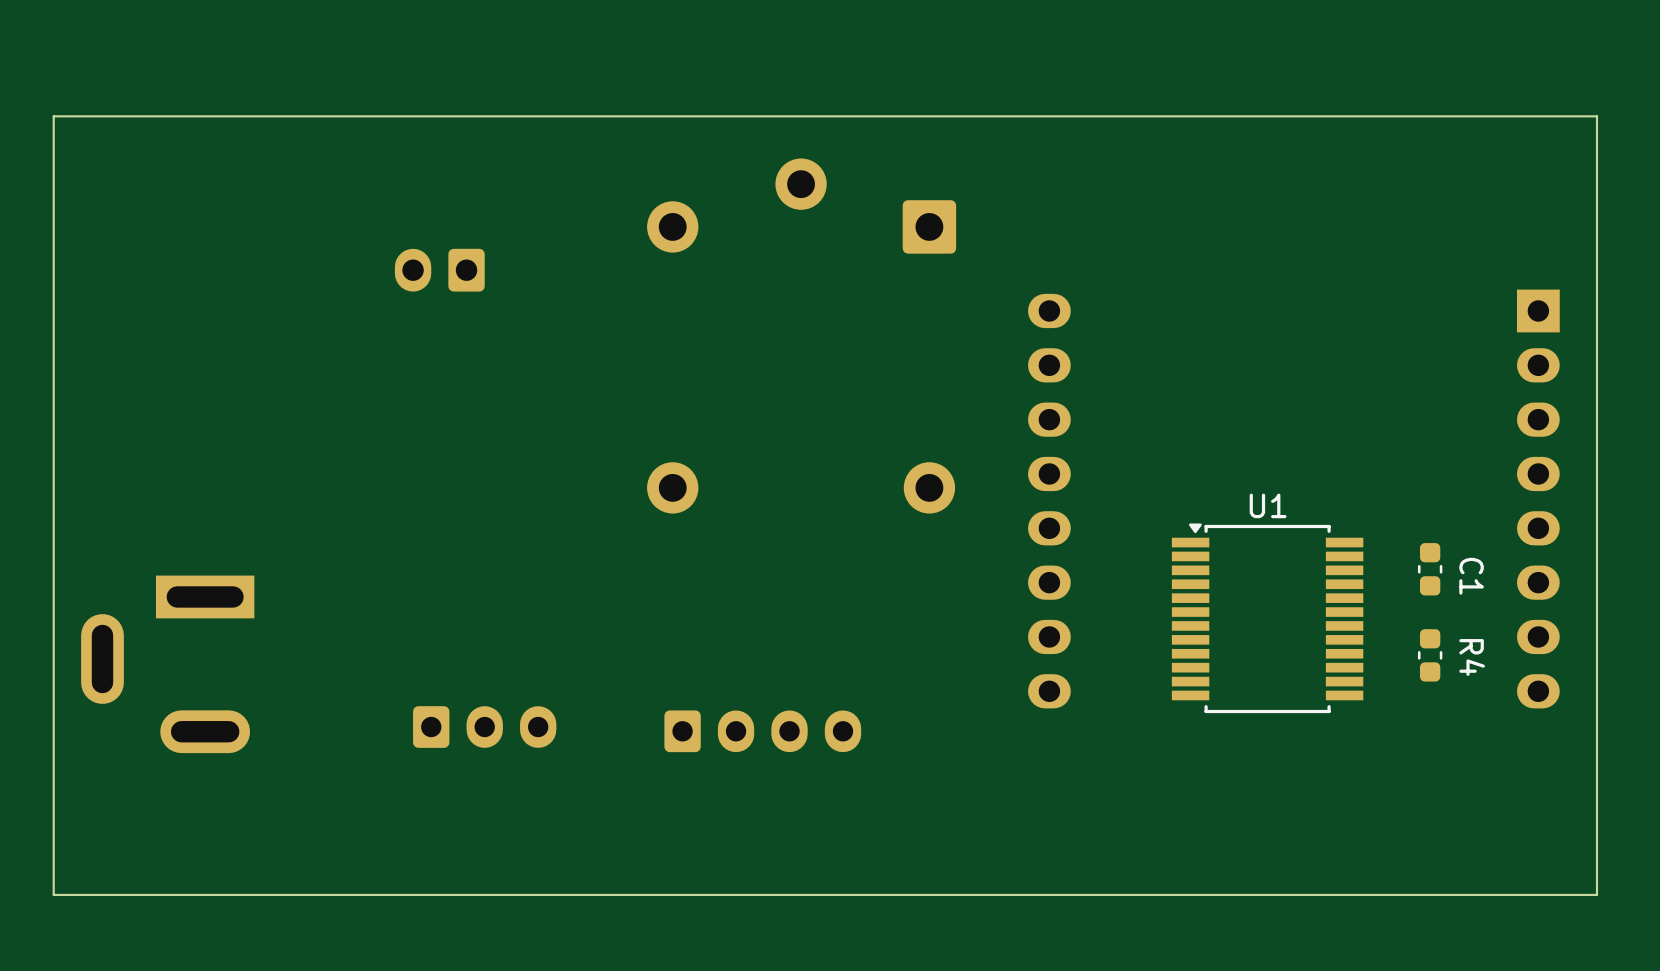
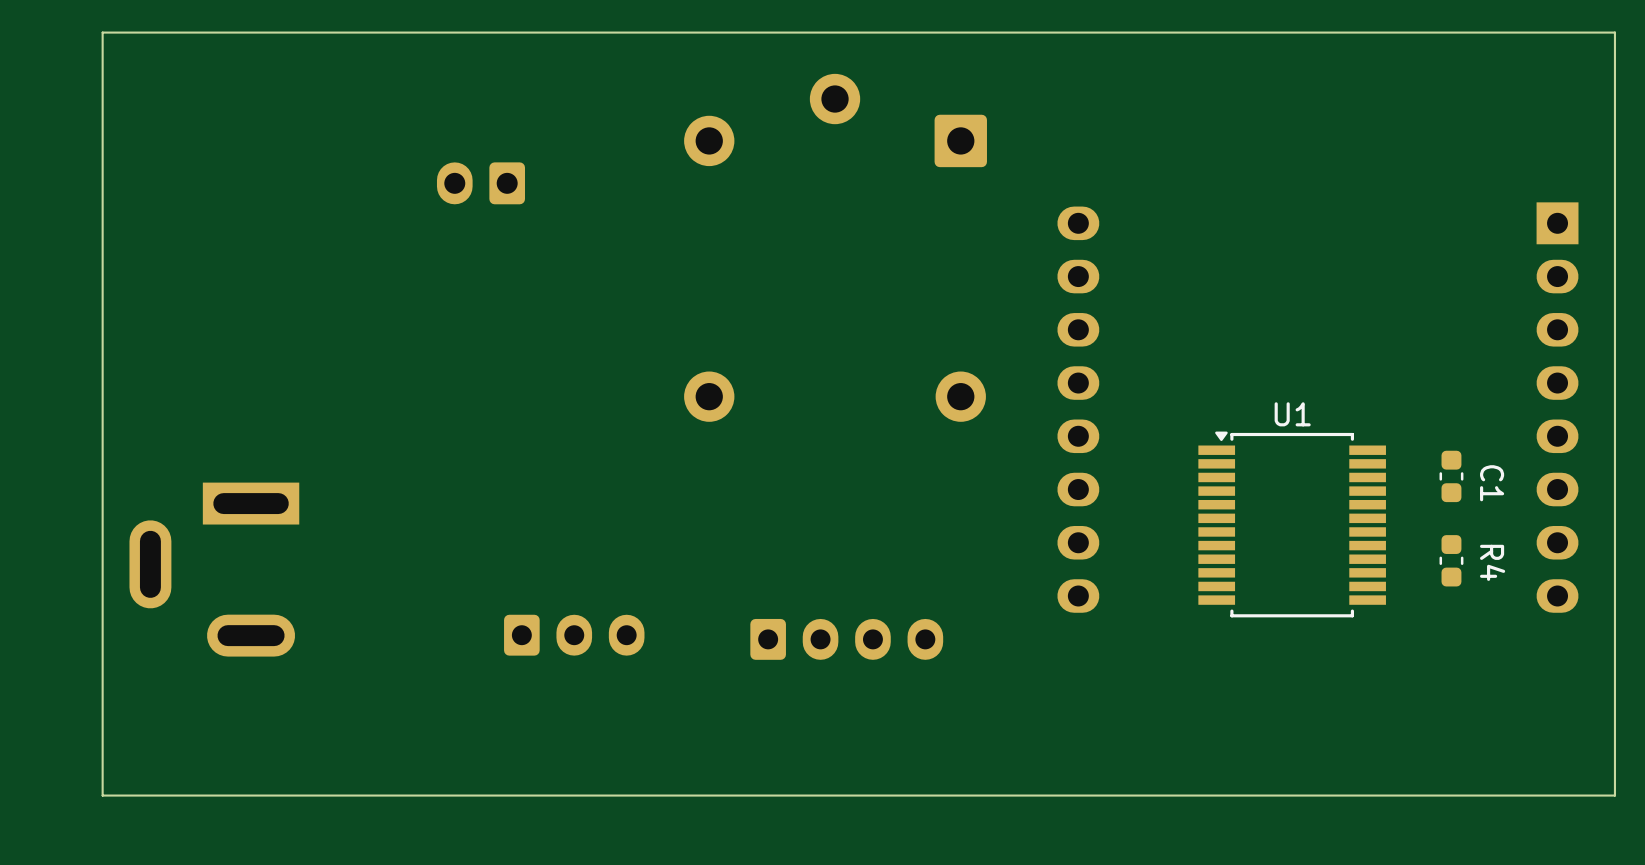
part position: (484, 727) -> (574, 635)
part position: (762, 731) -> (846, 639)

